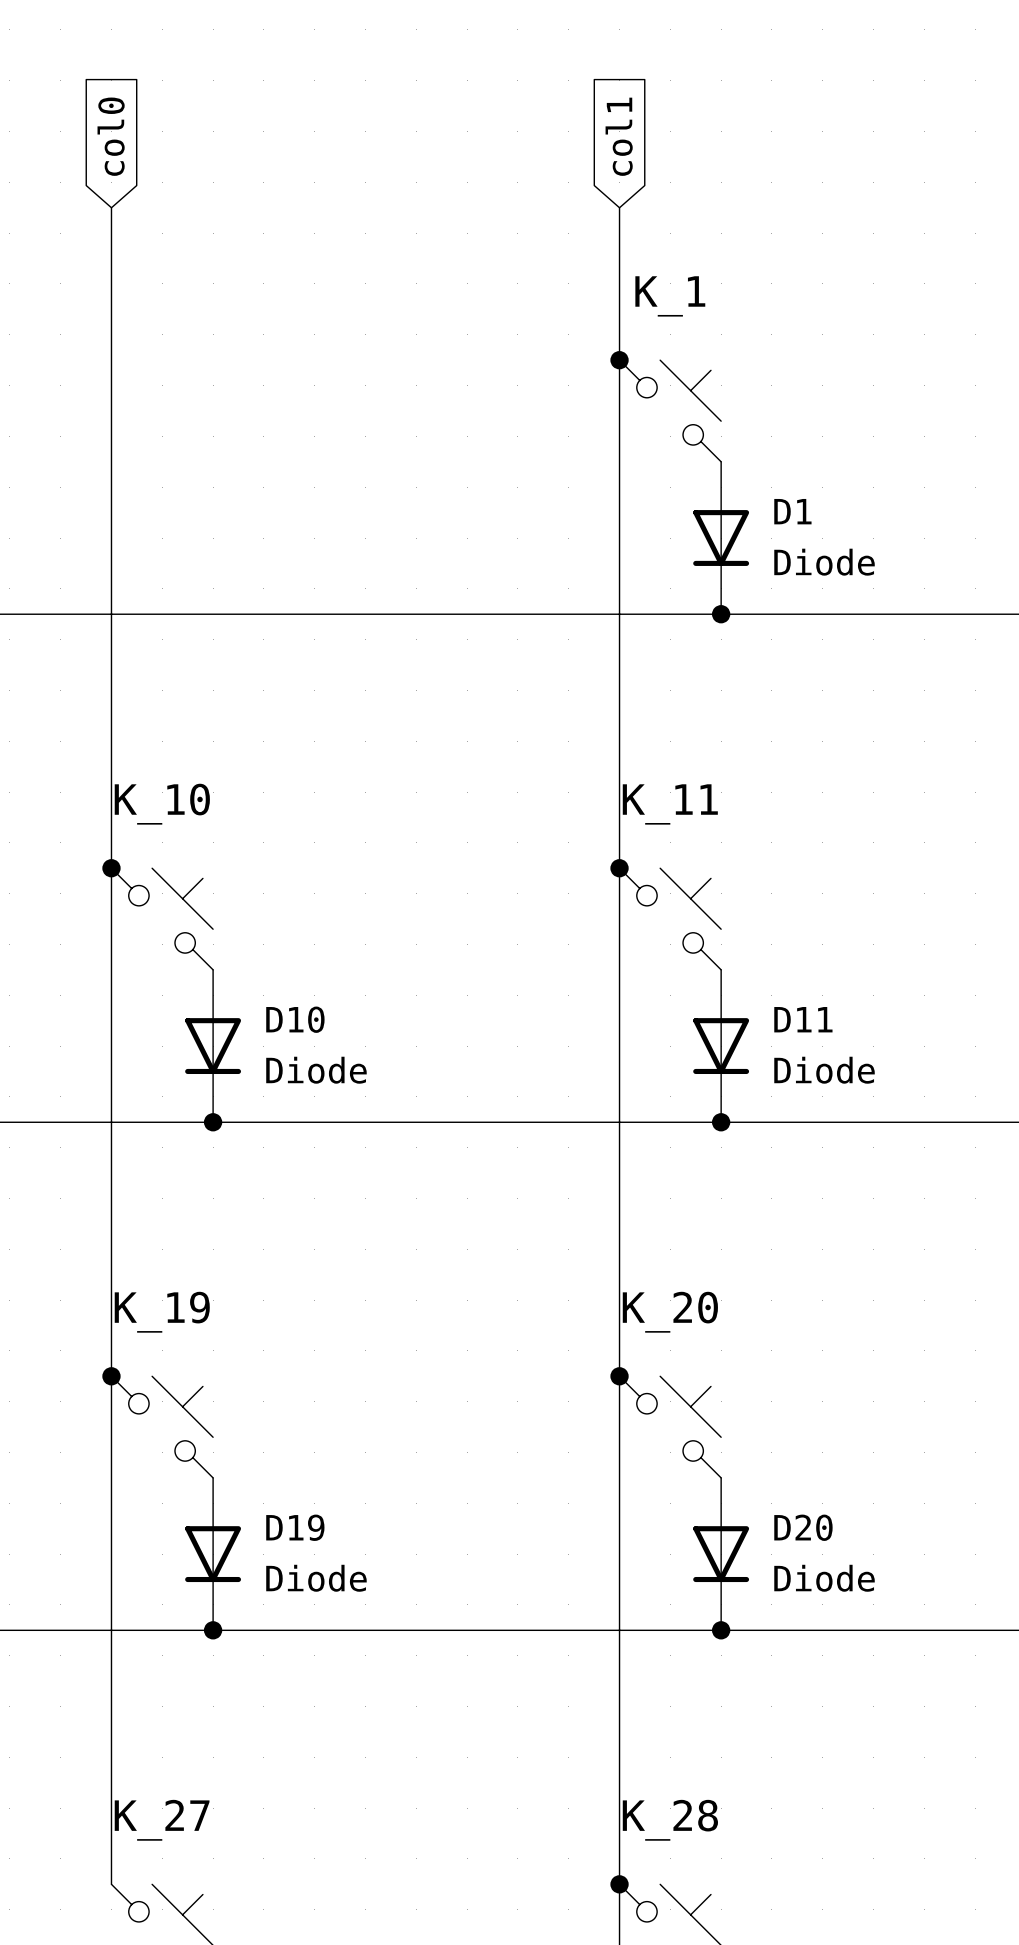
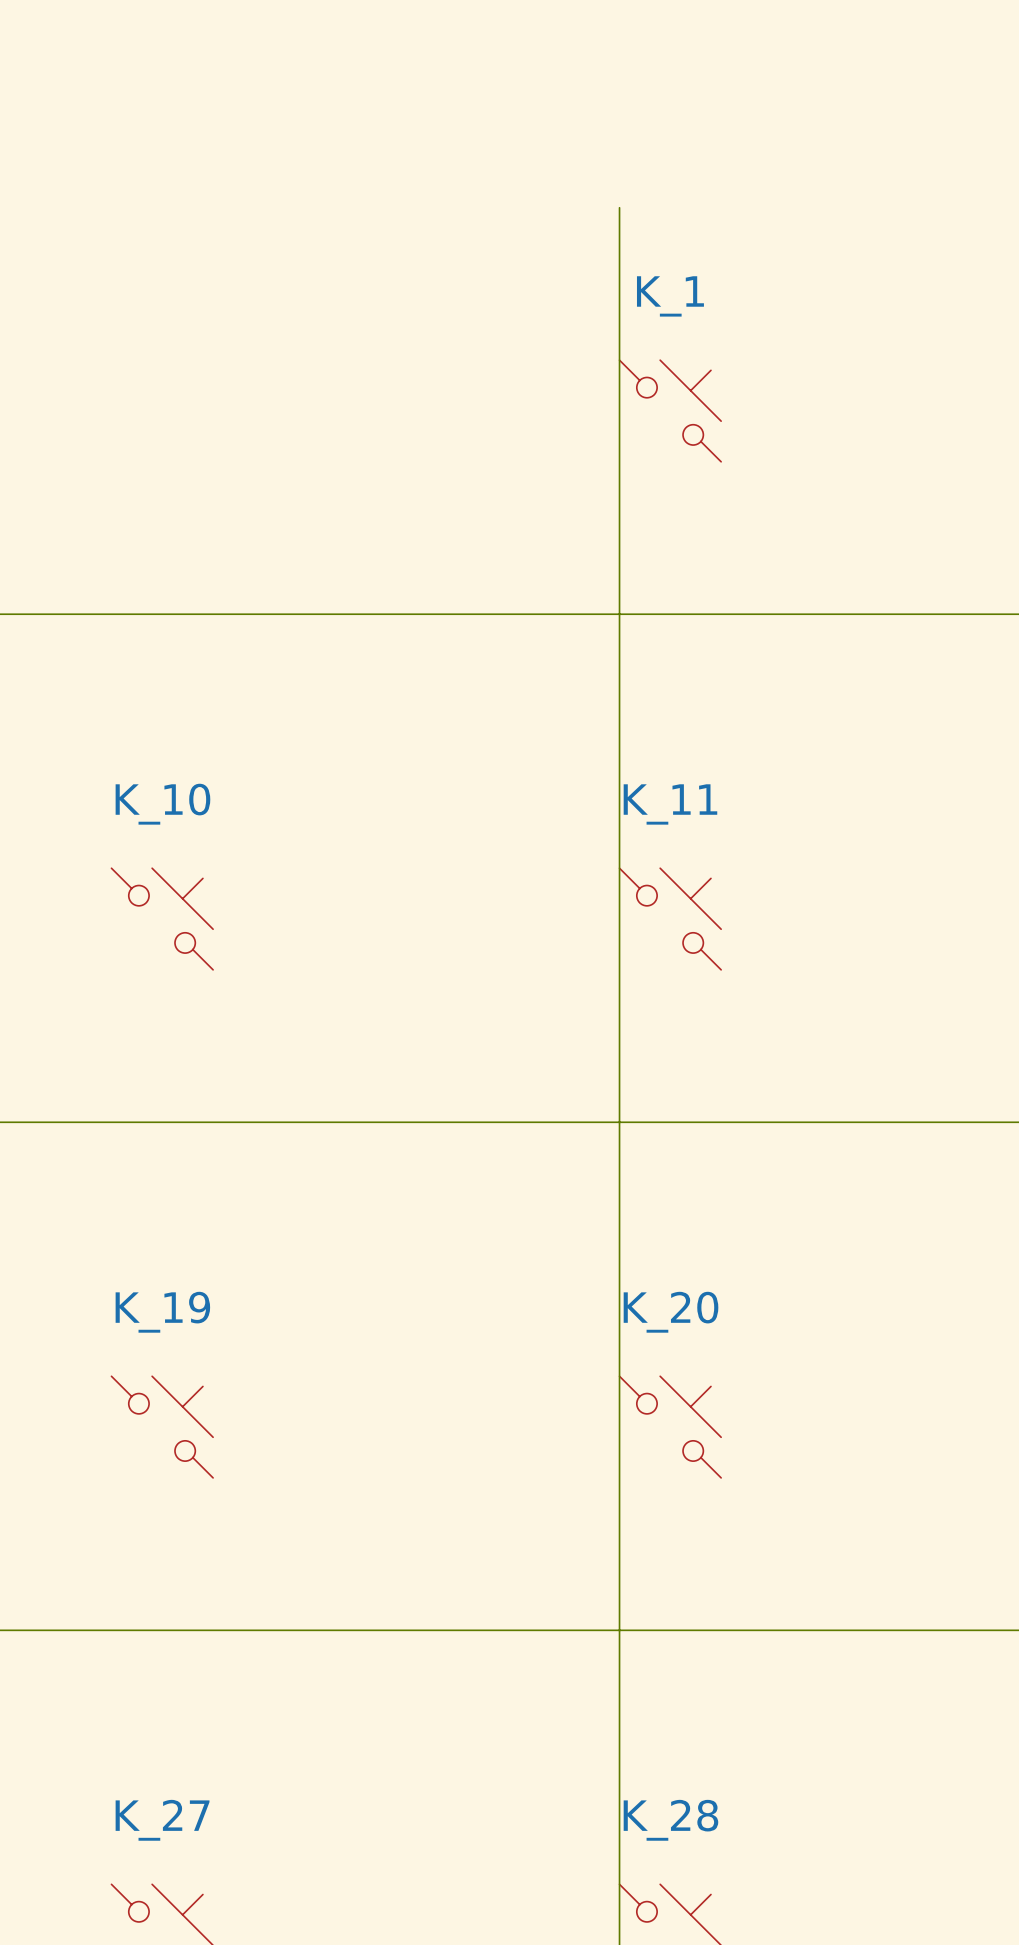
global label: col0 (111, 136) -> none
global label: col1 (619, 136) -> none
wire: (111, 207) (111, 1884) -> none
junction: (619, 360) -> none
D1: Diode (721, 538) -> none
junction: (721, 614) -> none
junction: (111, 868) -> none
junction: (619, 868) -> none
D10: Diode (213, 1046) -> none
D11: Diode (721, 1046) -> none
junction: (213, 1122) -> none
junction: (721, 1122) -> none
junction: (111, 1376) -> none
junction: (619, 1376) -> none
D19: Diode (213, 1554) -> none
D20: Diode (721, 1554) -> none
junction: (213, 1630) -> none
junction: (721, 1630) -> none
junction: (619, 1884) -> none

